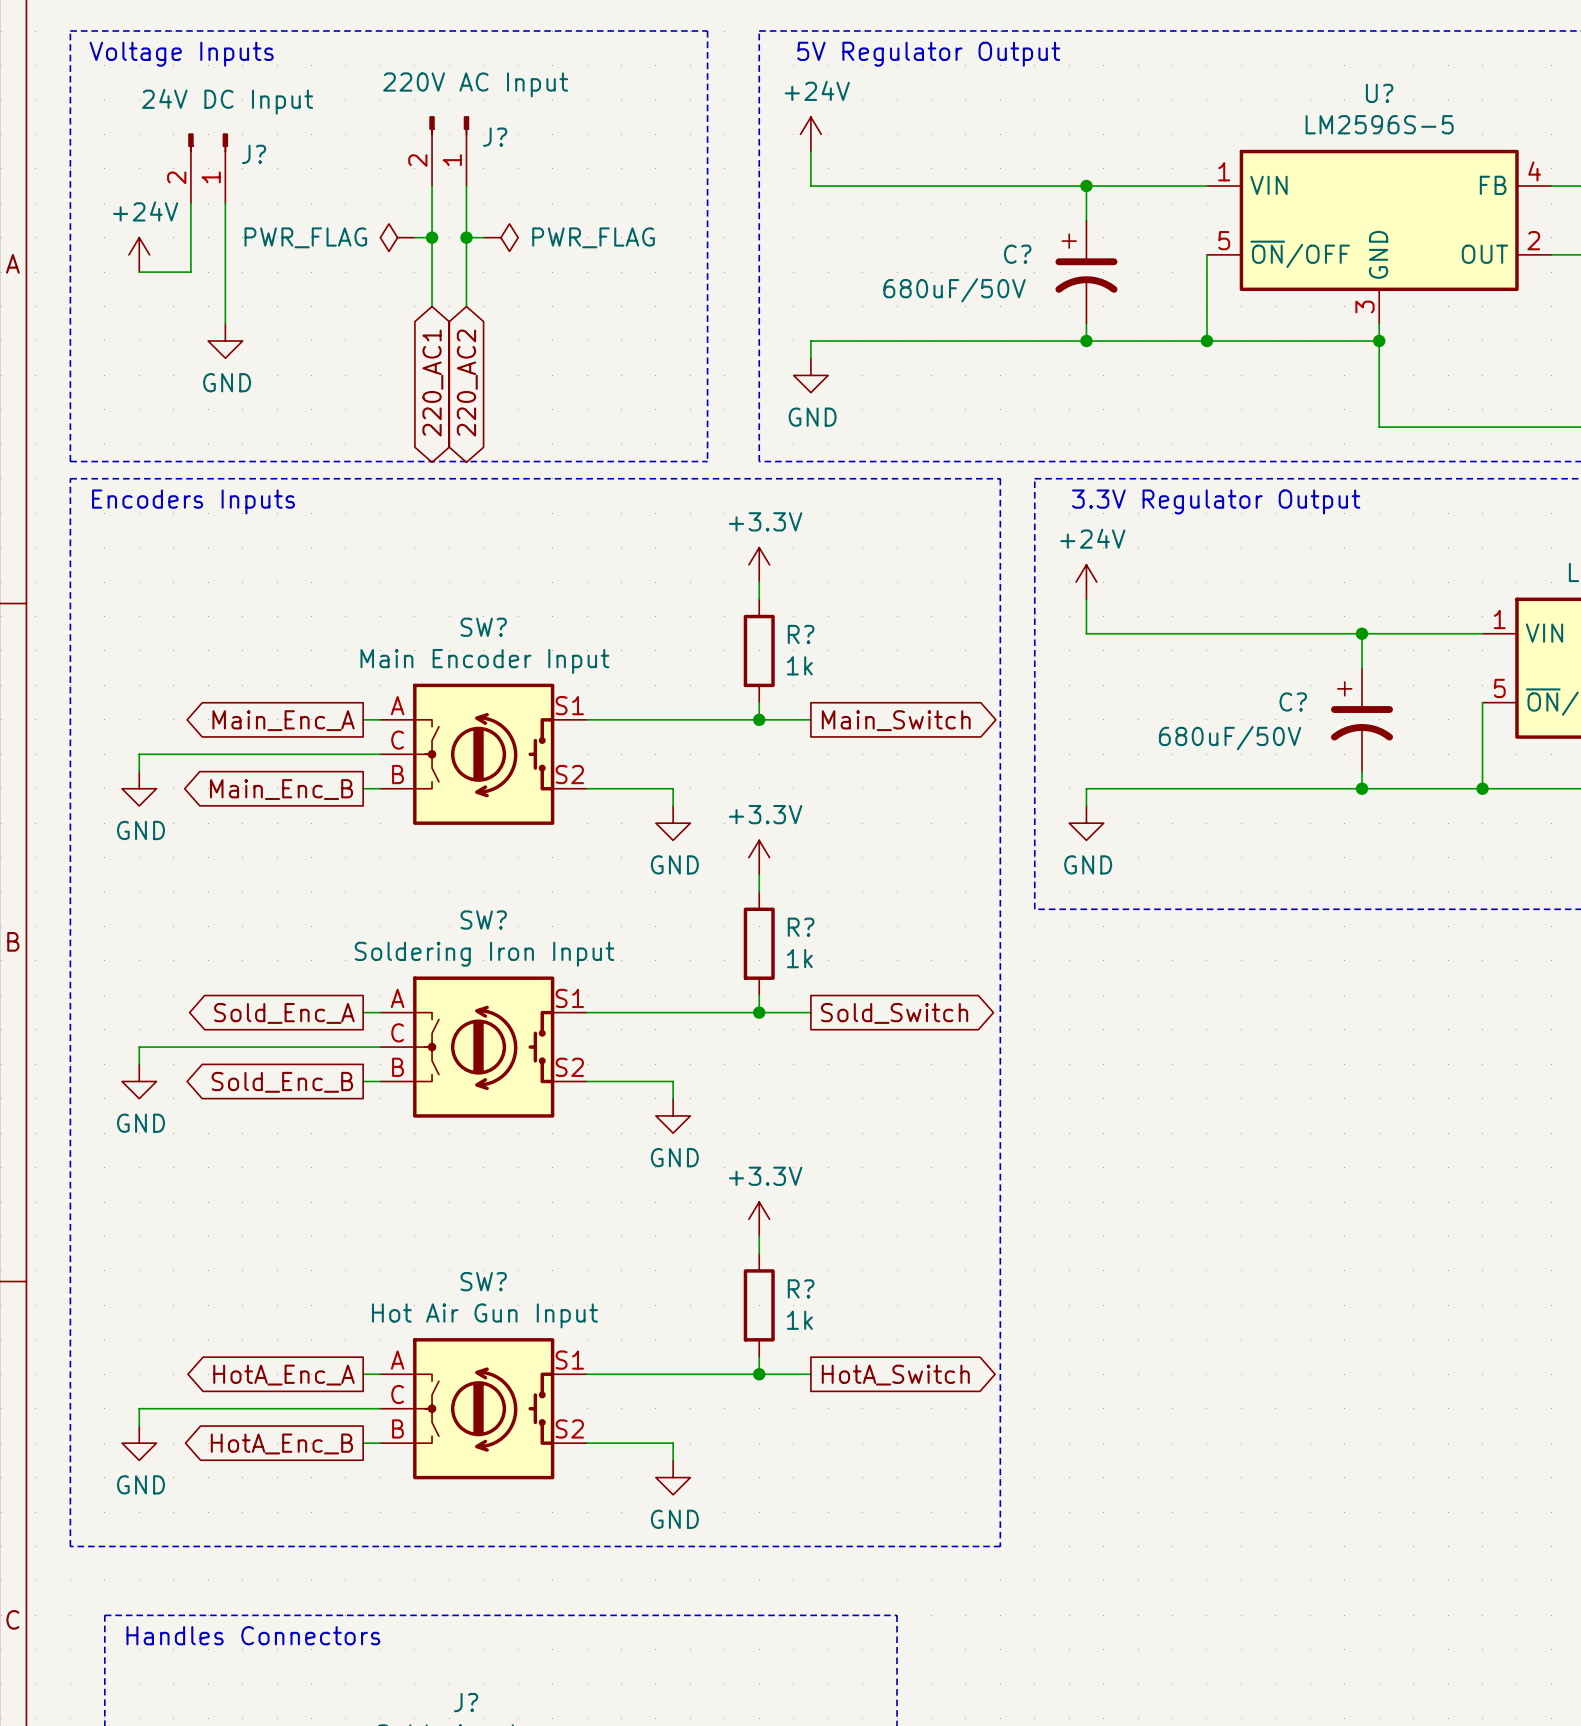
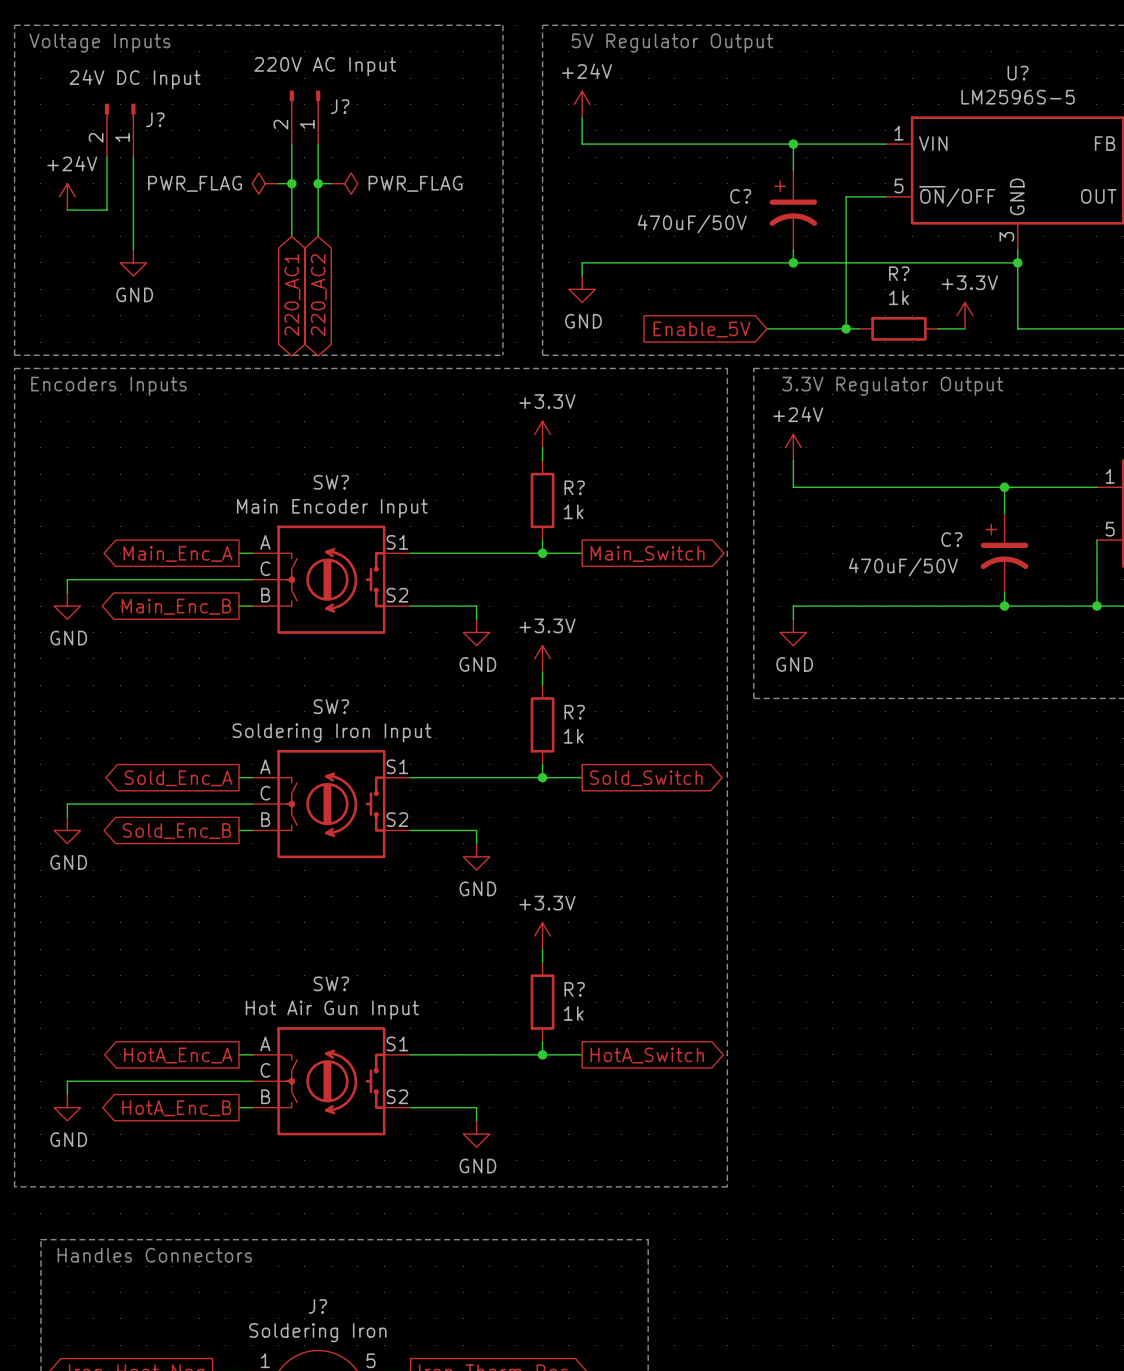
wire: (1206, 254) (1206, 340) -> (885, 196) (846, 196) (846, 328)
C? value: 680uF/50V (954, 290) -> 470uF/50V (692, 224)
junction: (1206, 340) -> none
power symbol: none -> +3.3V (964, 315)
global label: none -> Enable_5V (702, 329)
wire: none -> (766, 328) (859, 328)
junction: none -> (846, 328)
R?: none -> 1k (898, 328)
wire: none -> (938, 328) (964, 328)
C? value: 680uF/50V (1230, 738) -> 470uF/50V (903, 567)

